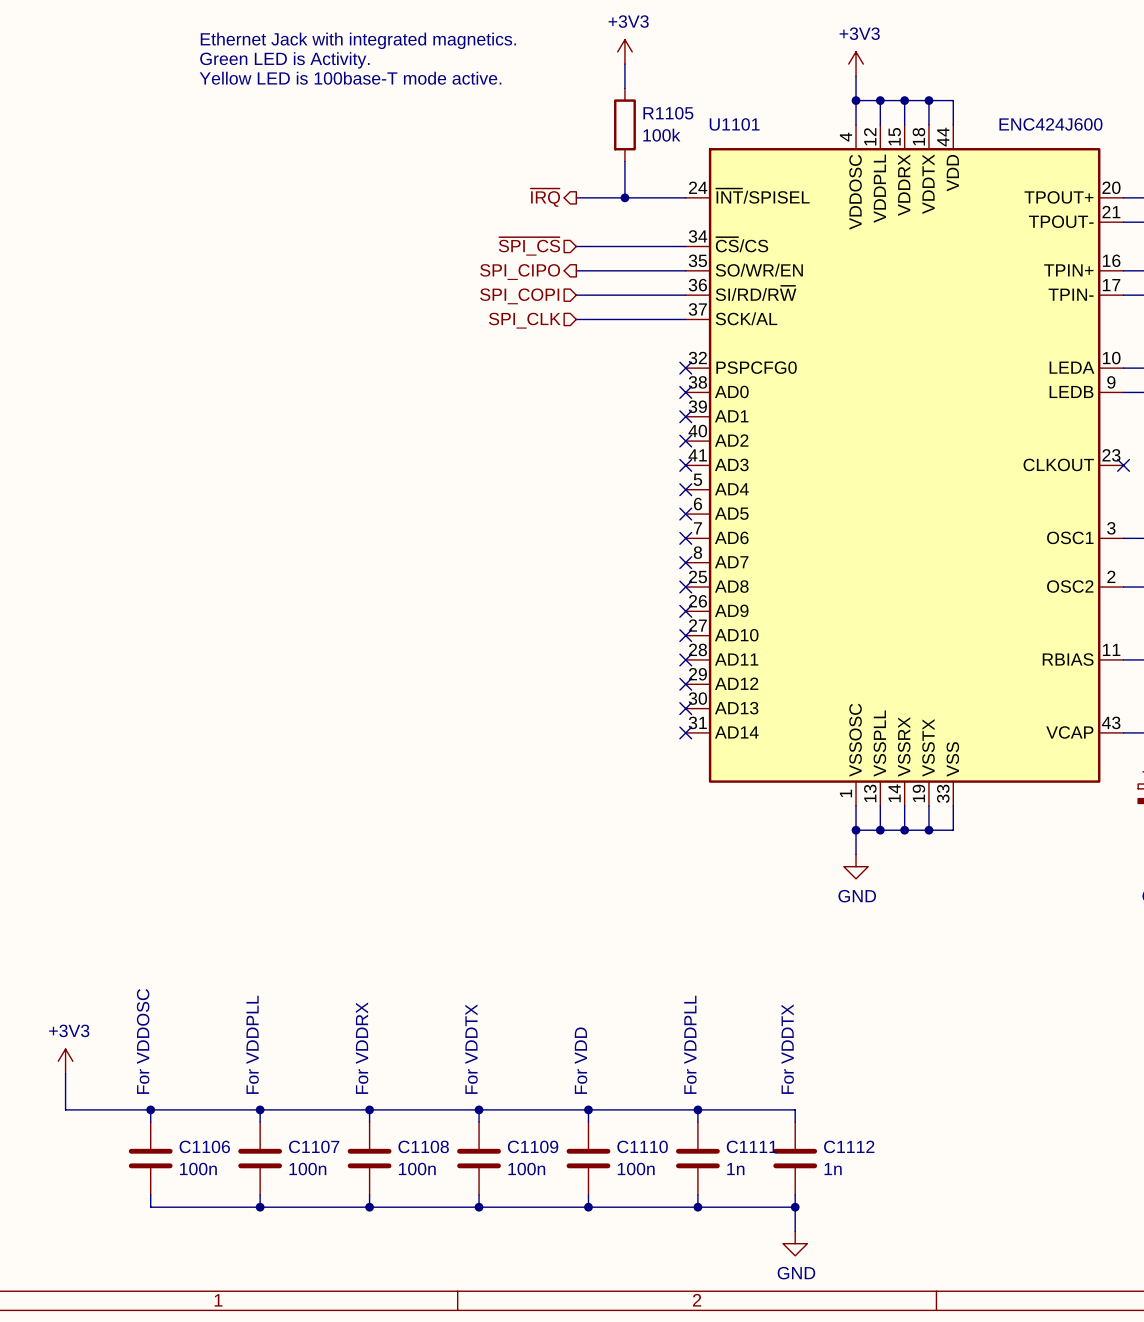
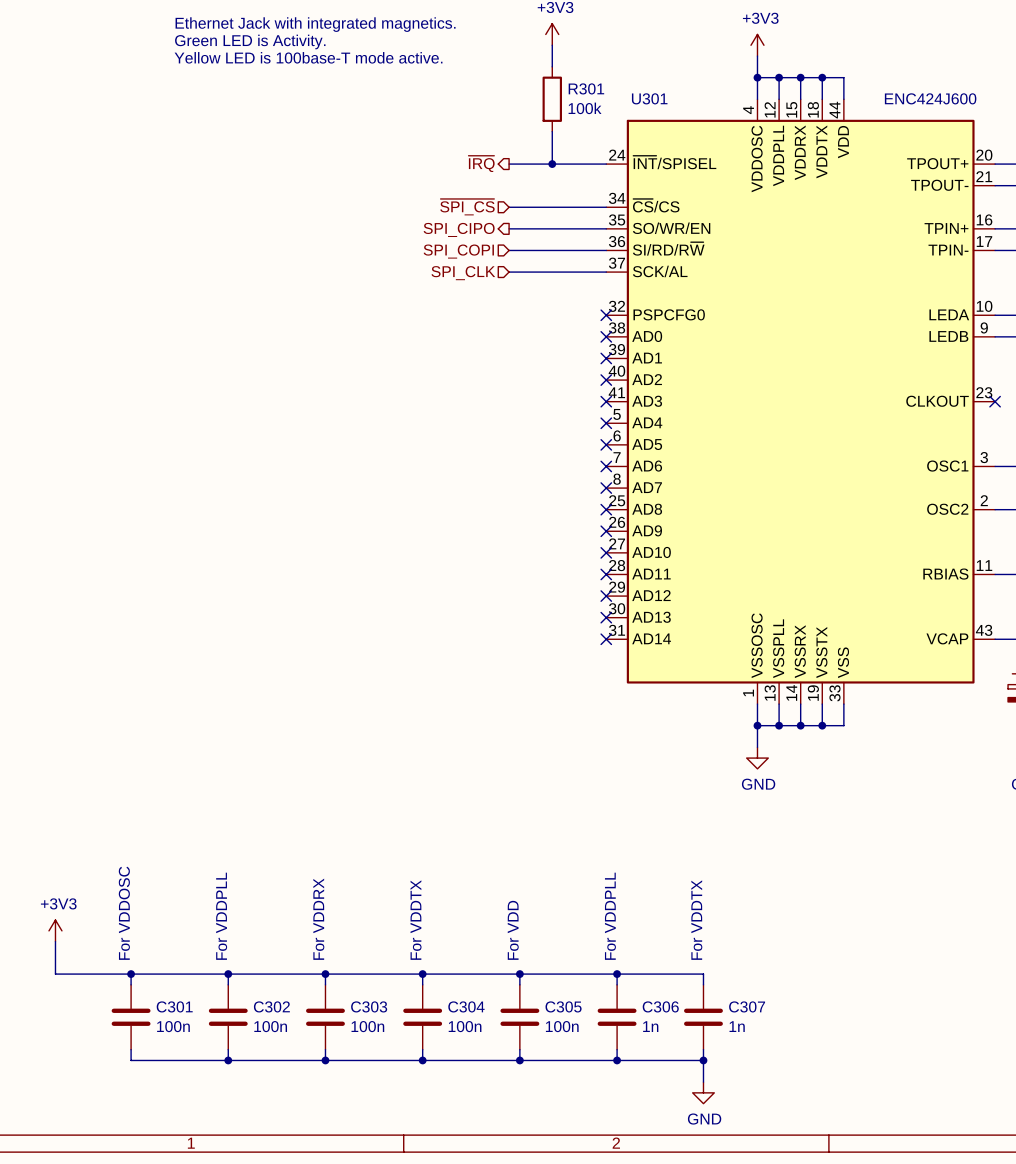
R1105 name: R1105 (668, 113) -> R301 (586, 88)
U1101 name: U1101 (734, 124) -> U301 (649, 98)
C1106 name: C1106 (204, 1146) -> C301 (174, 1006)
C1107 name: C1107 (314, 1146) -> C302 (271, 1006)
C1108 name: C1108 (423, 1146) -> C303 (369, 1006)
C1109 name: C1109 (533, 1146) -> C304 (466, 1006)
C1110 name: C1110 (642, 1146) -> C305 (563, 1006)
C1111 name: C1111 (751, 1146) -> C306 (660, 1006)
C1112 name: C1112 (849, 1146) -> C307 (747, 1006)

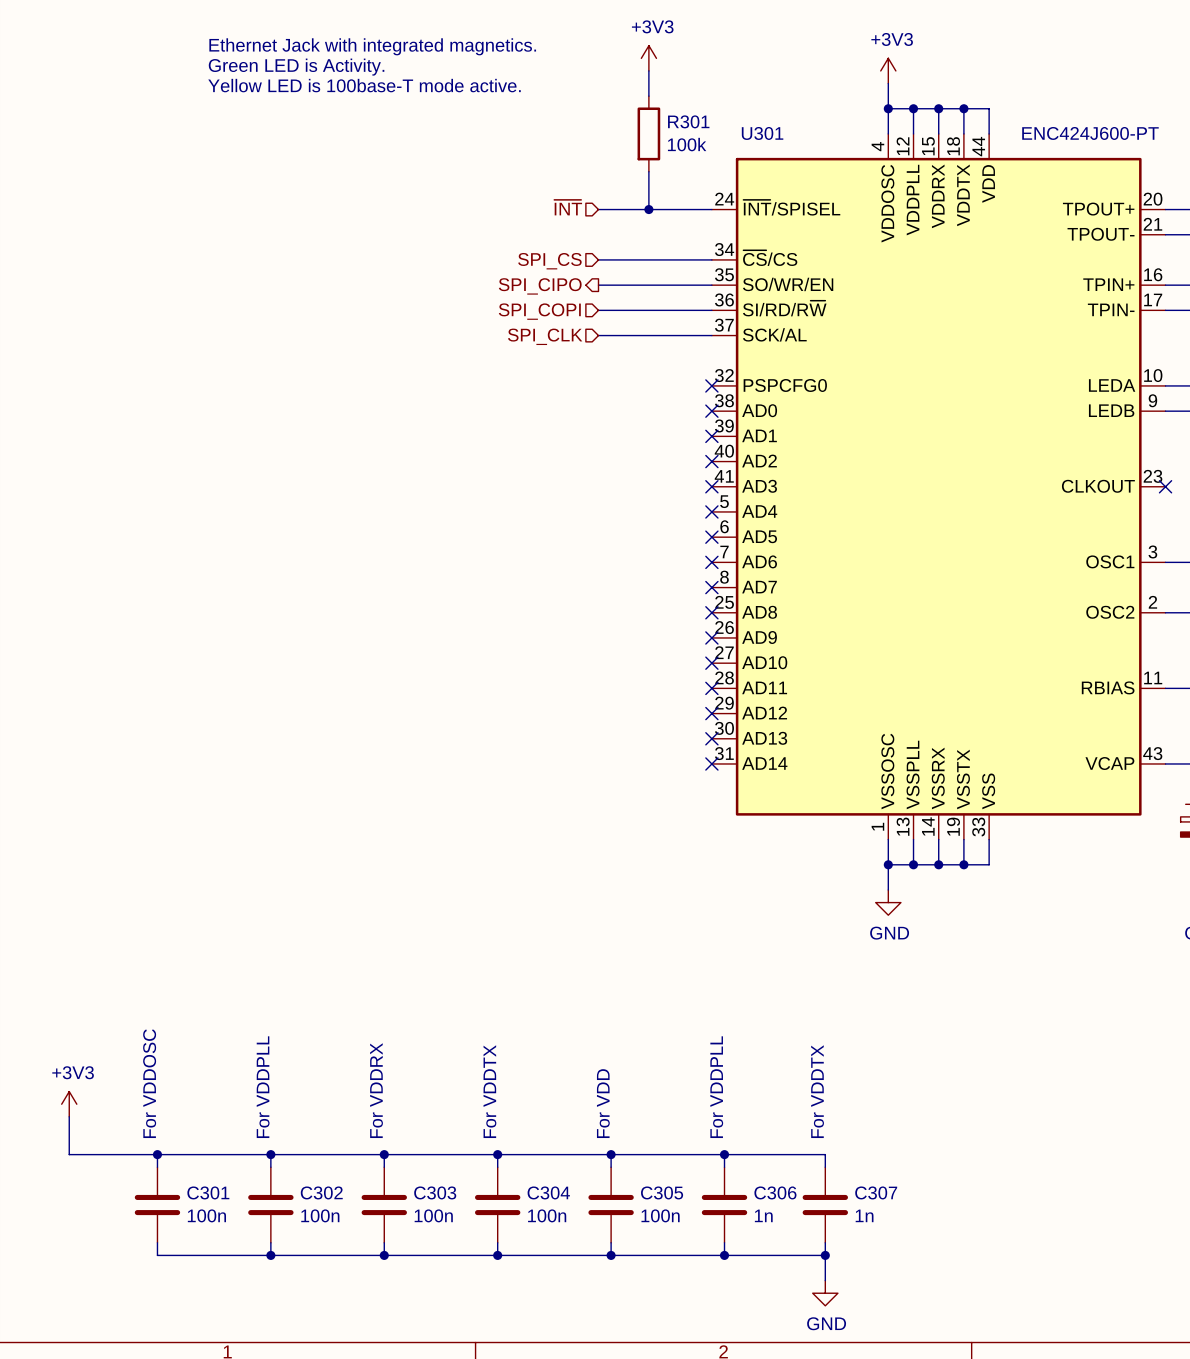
U301 value: ENC424J600 (930, 98) -> ENC424J600-PT (1090, 133)
hierarchical label shape: output (481, 163) -> input (568, 207)
hierarchical label: ~{IRQ} (481, 163) -> ~{INT} (568, 207)
hierarchical label: ~{SPI_CS} (467, 207) -> SPI_CS (549, 261)

